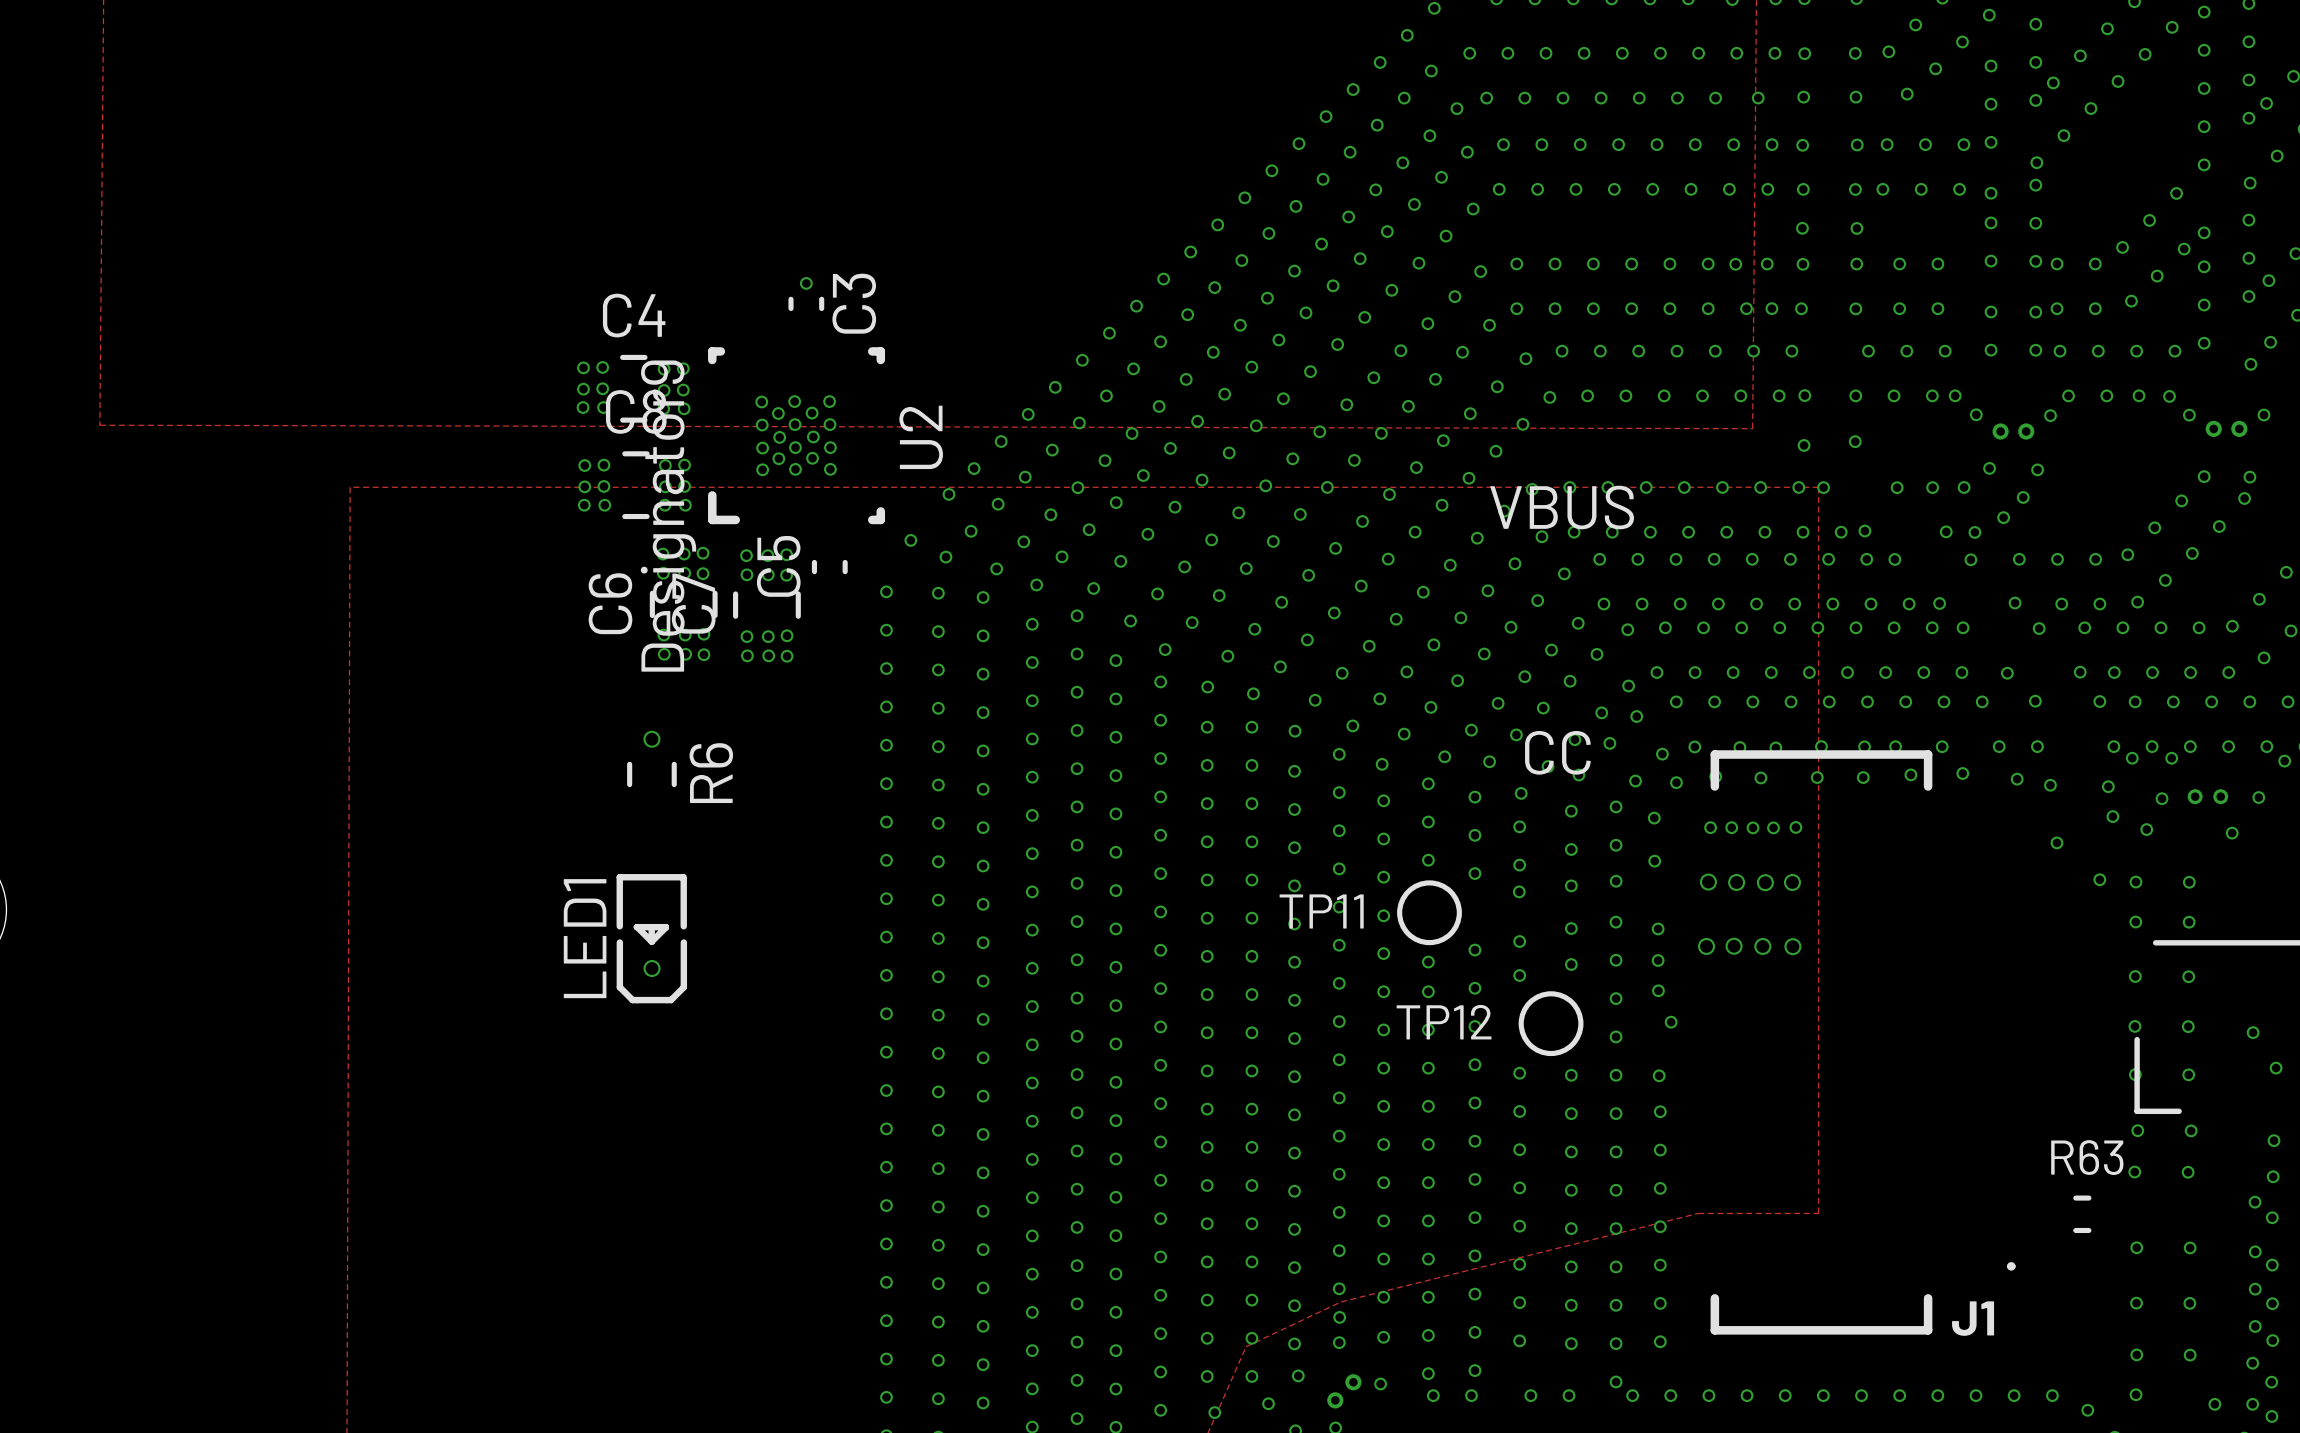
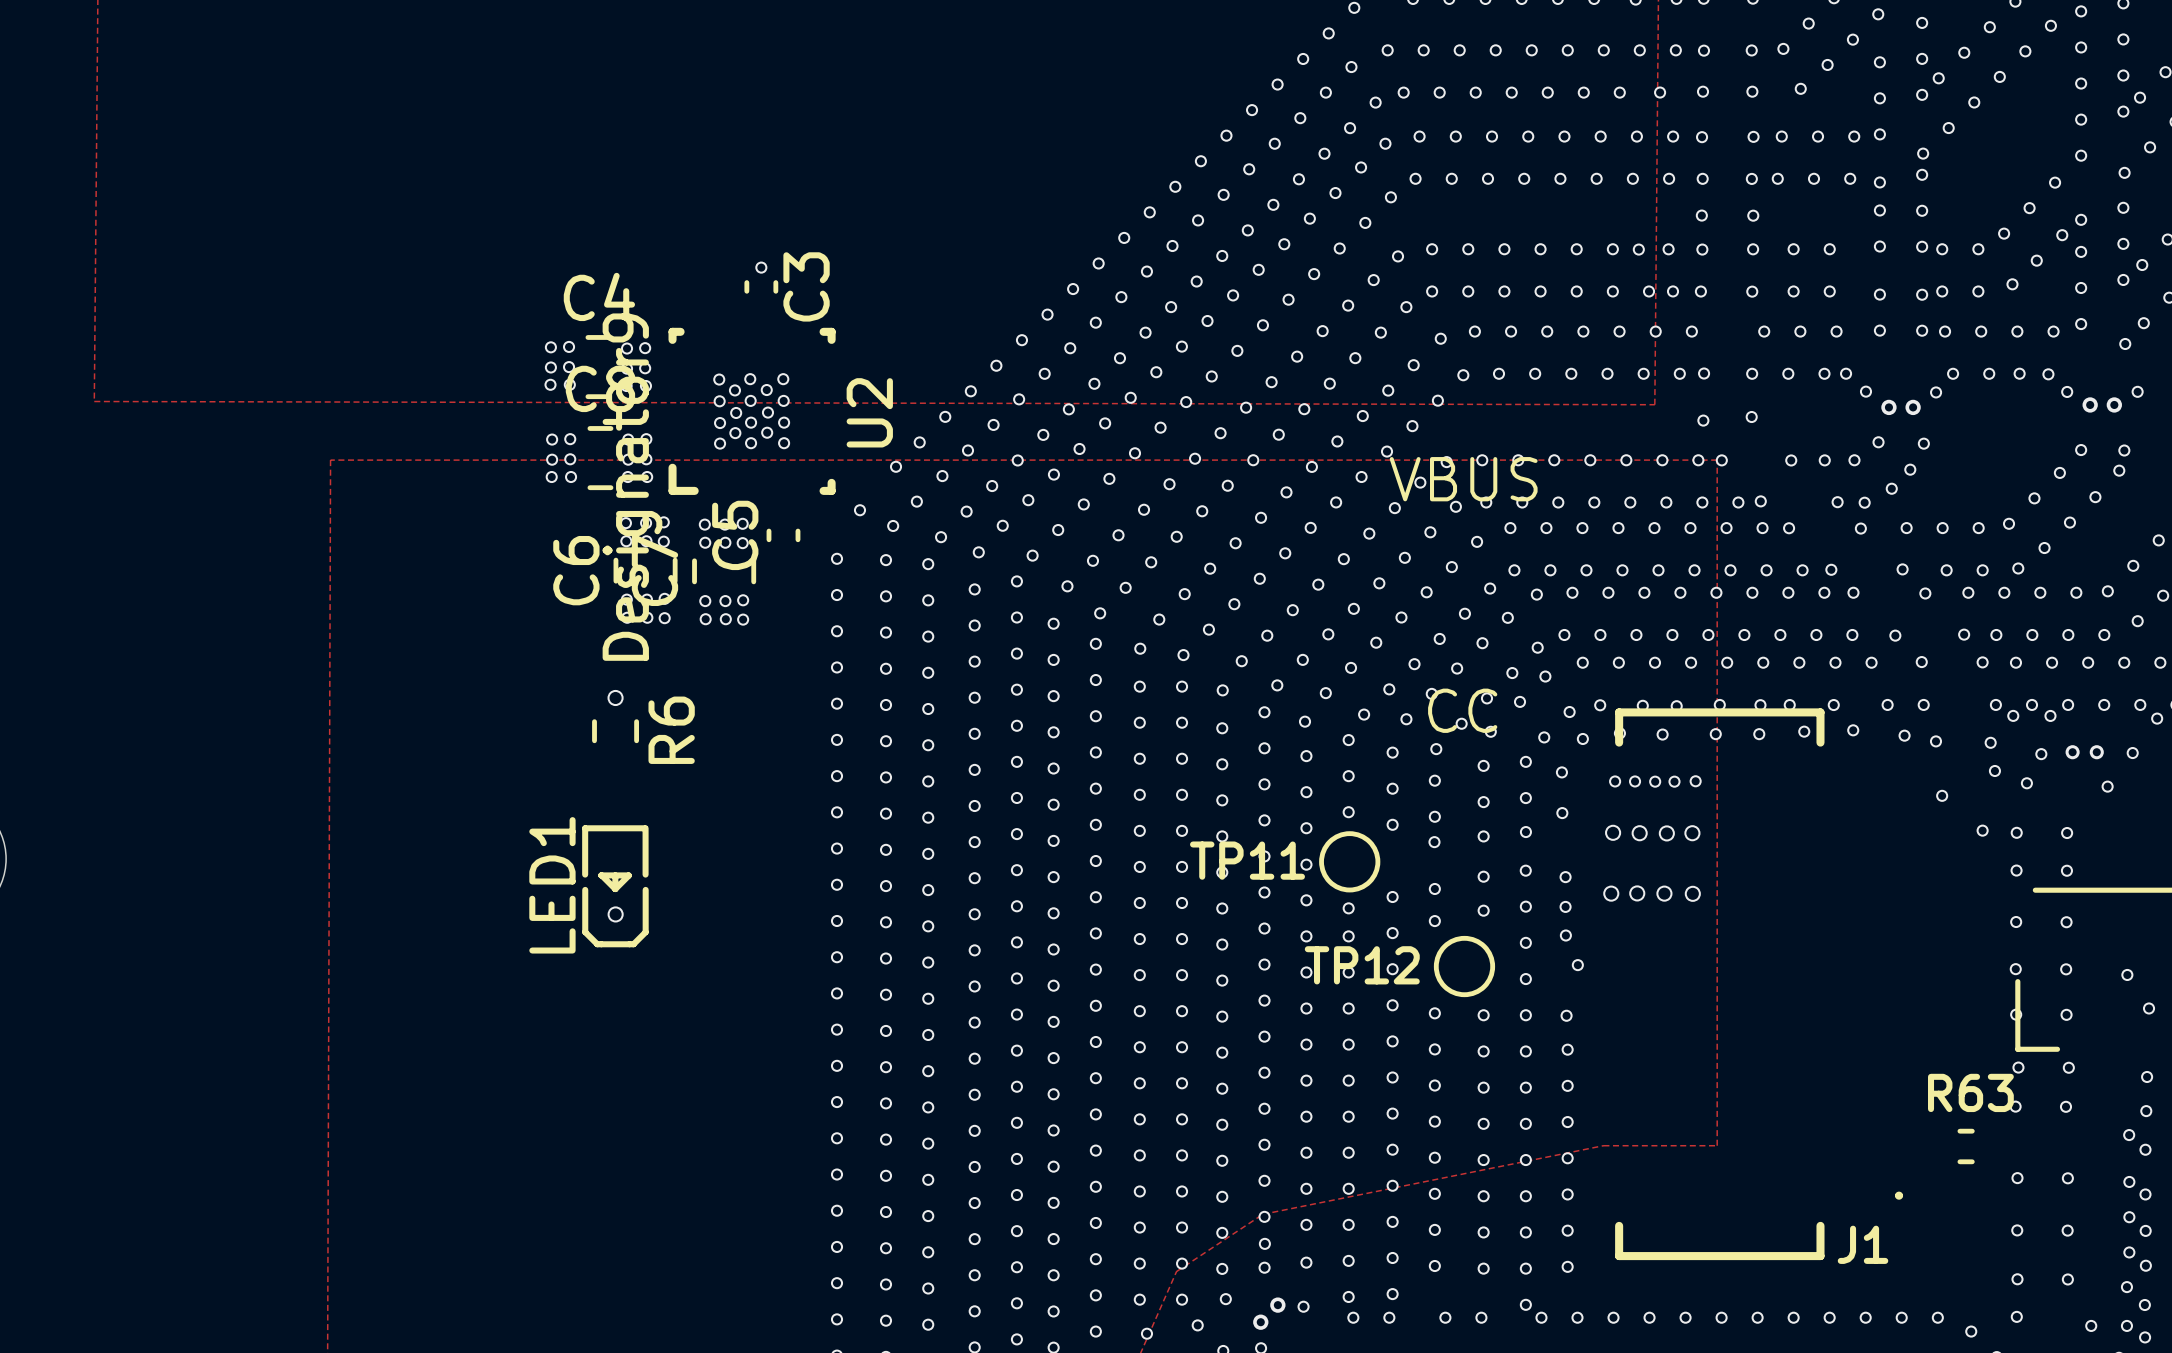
zone outline: (1698, 1213) (1340, 1301) (1246, 1346) -> (1603, 1145) (1262, 1214) (1176, 1271)

